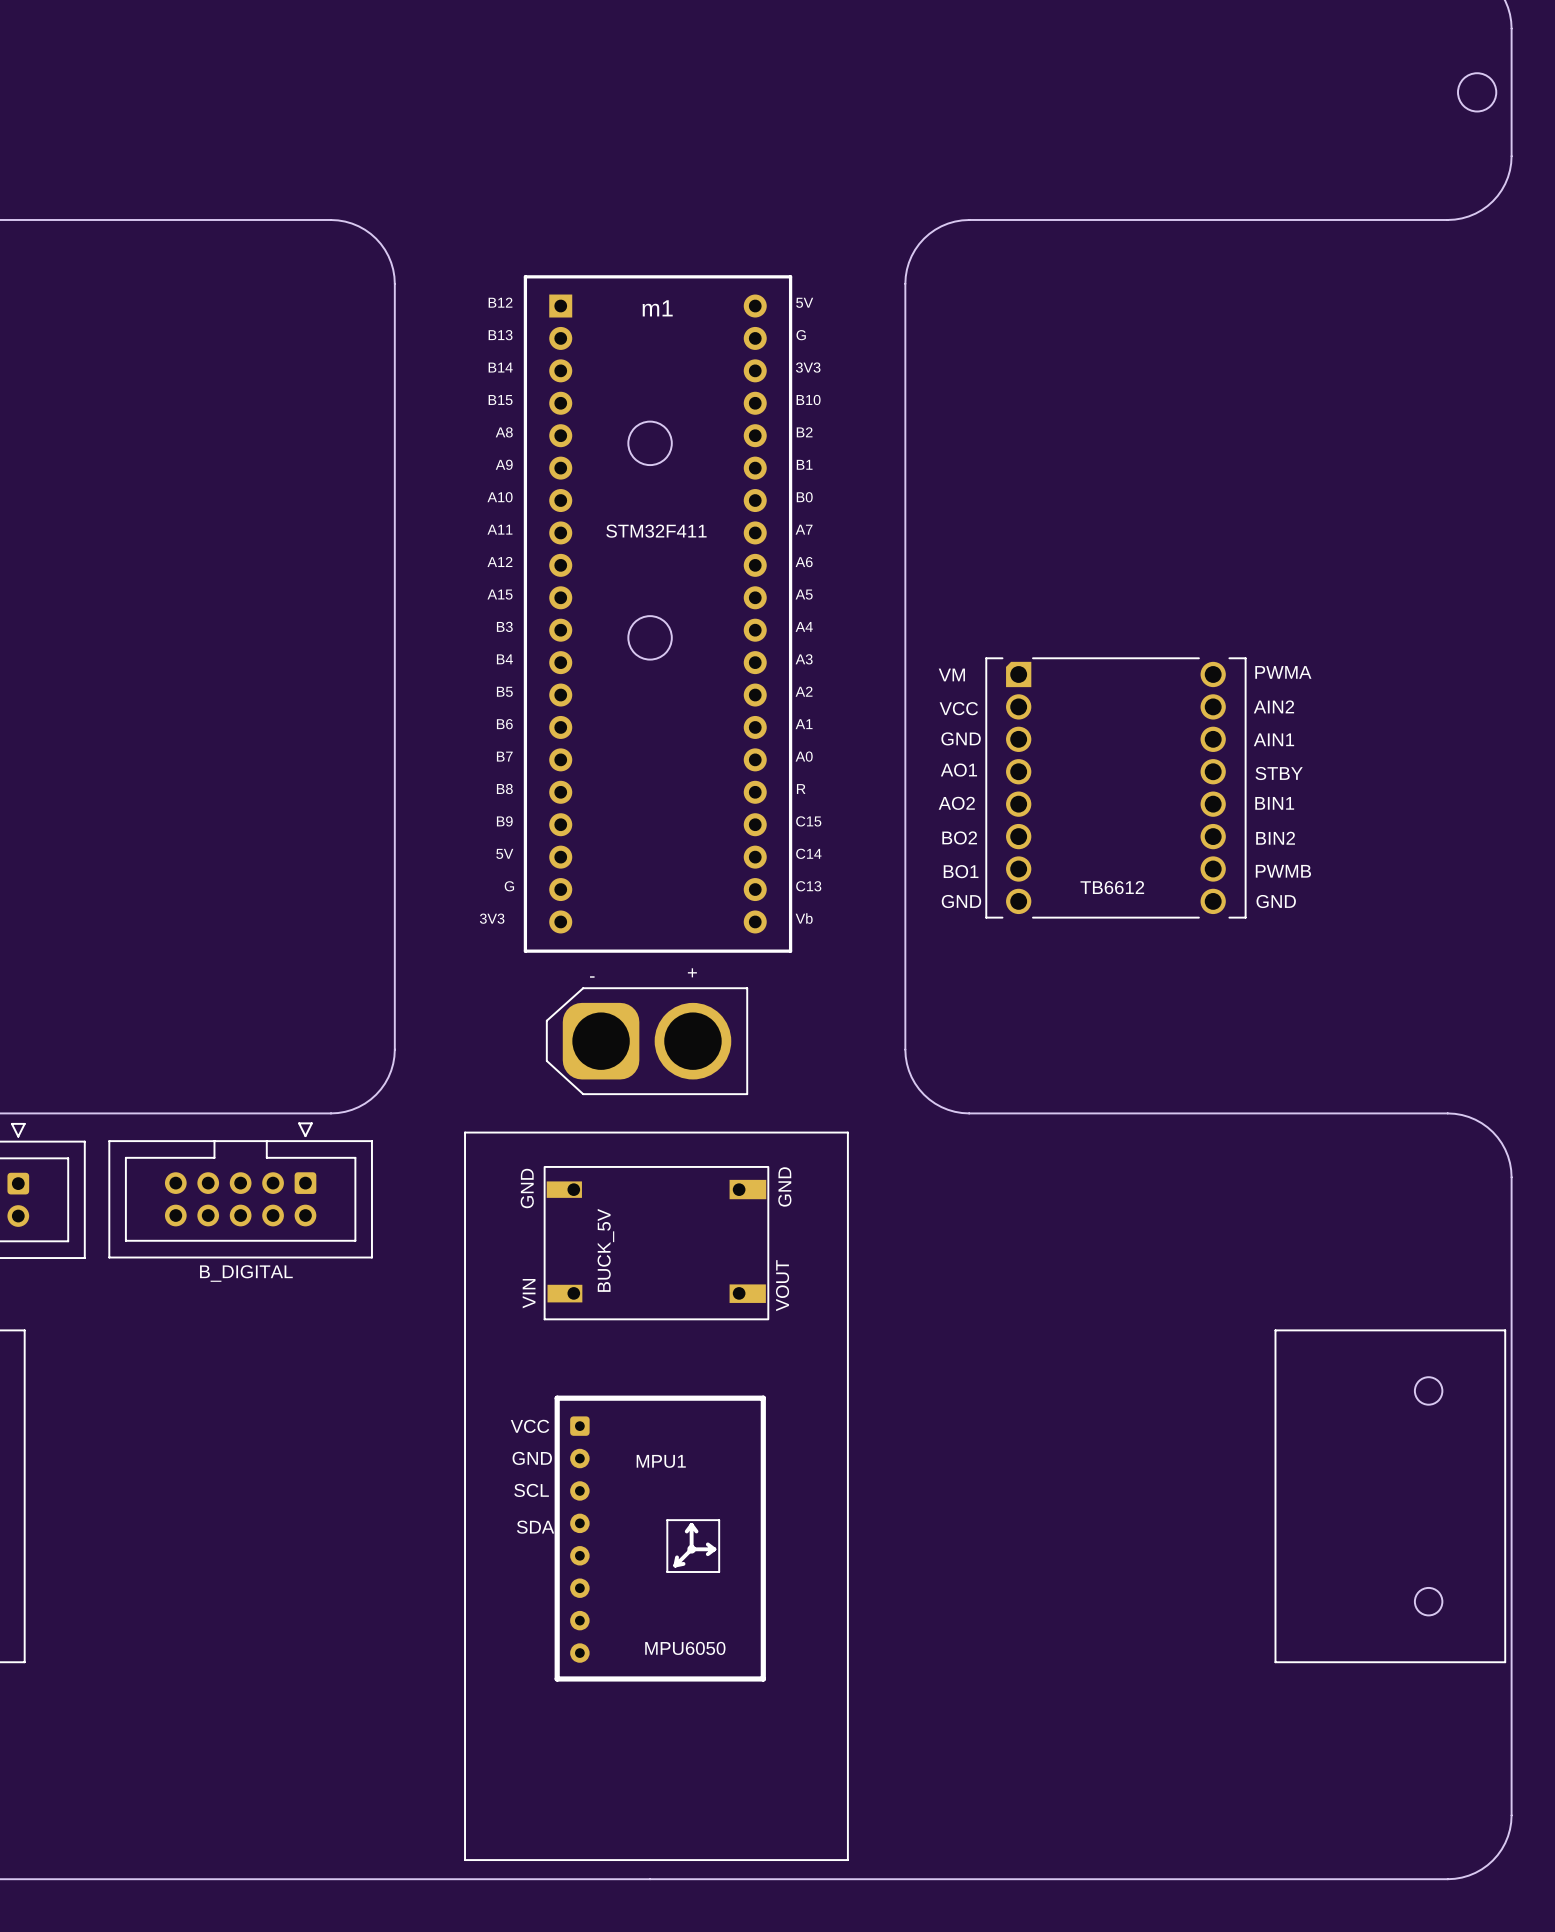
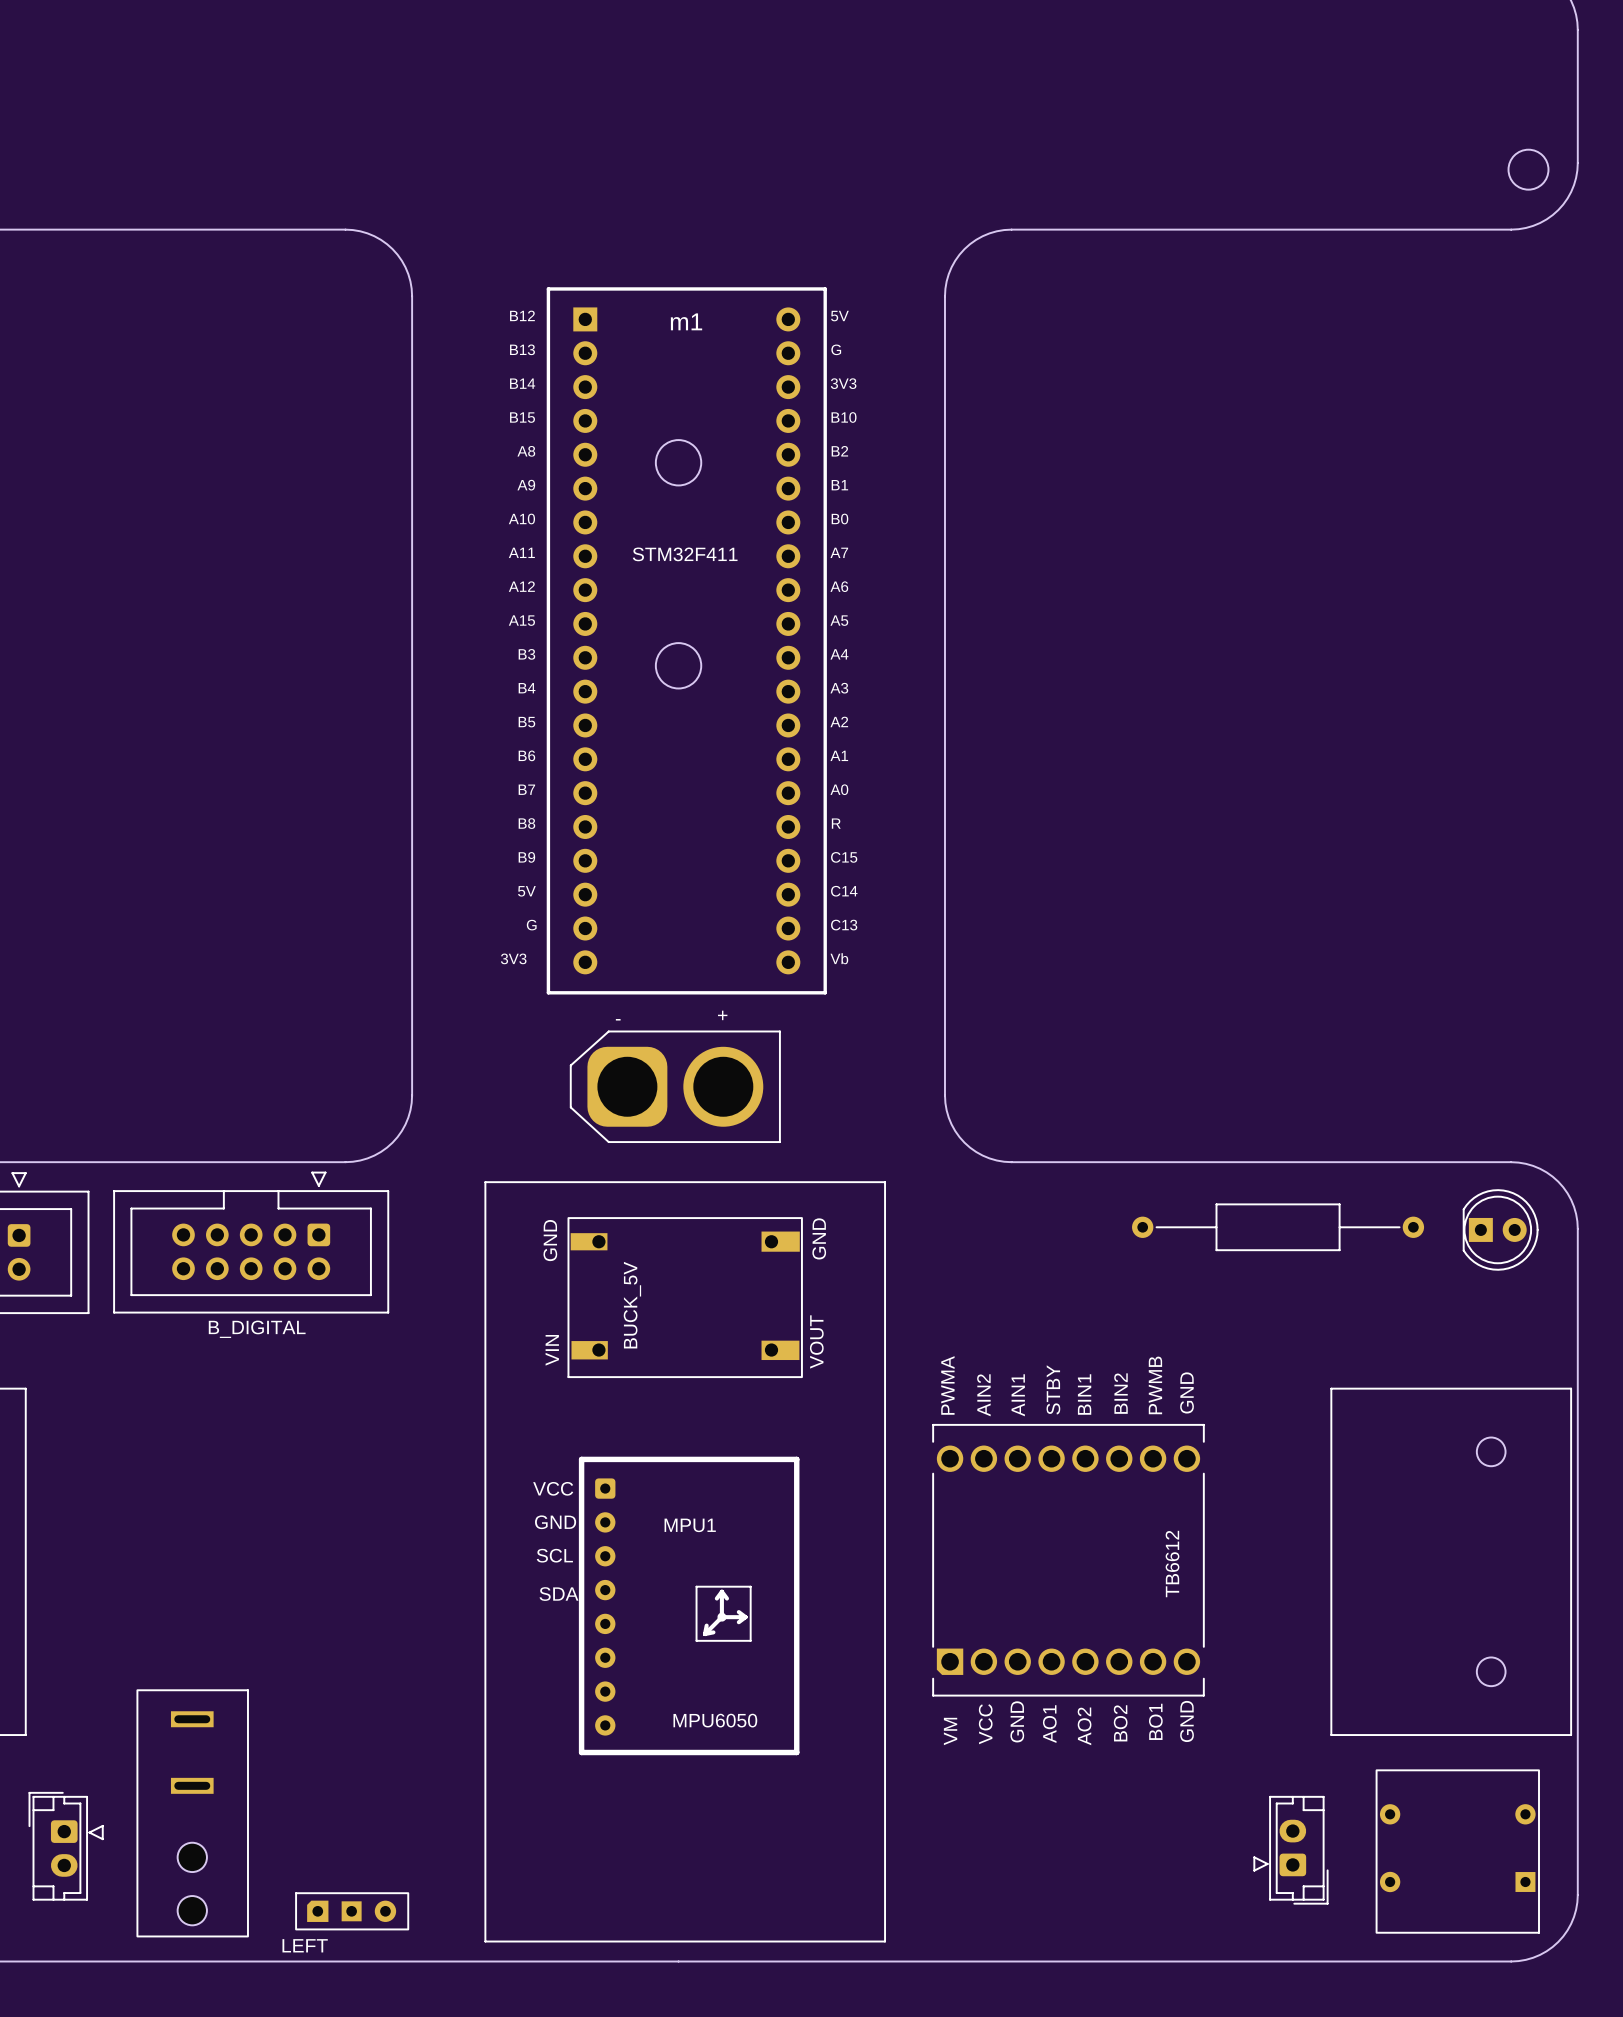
round board edge position: (1477, 92) -> (1528, 169)
part: (1115, 787) -> none
part: none -> (1278, 1227)
part: none -> (1500, 1229)
part: none -> (1068, 1560)
part: none -> (192, 1813)
part: none -> (66, 1846)
part: none -> (1290, 1850)
part: none -> (1457, 1851)
part: none -> (352, 1911)

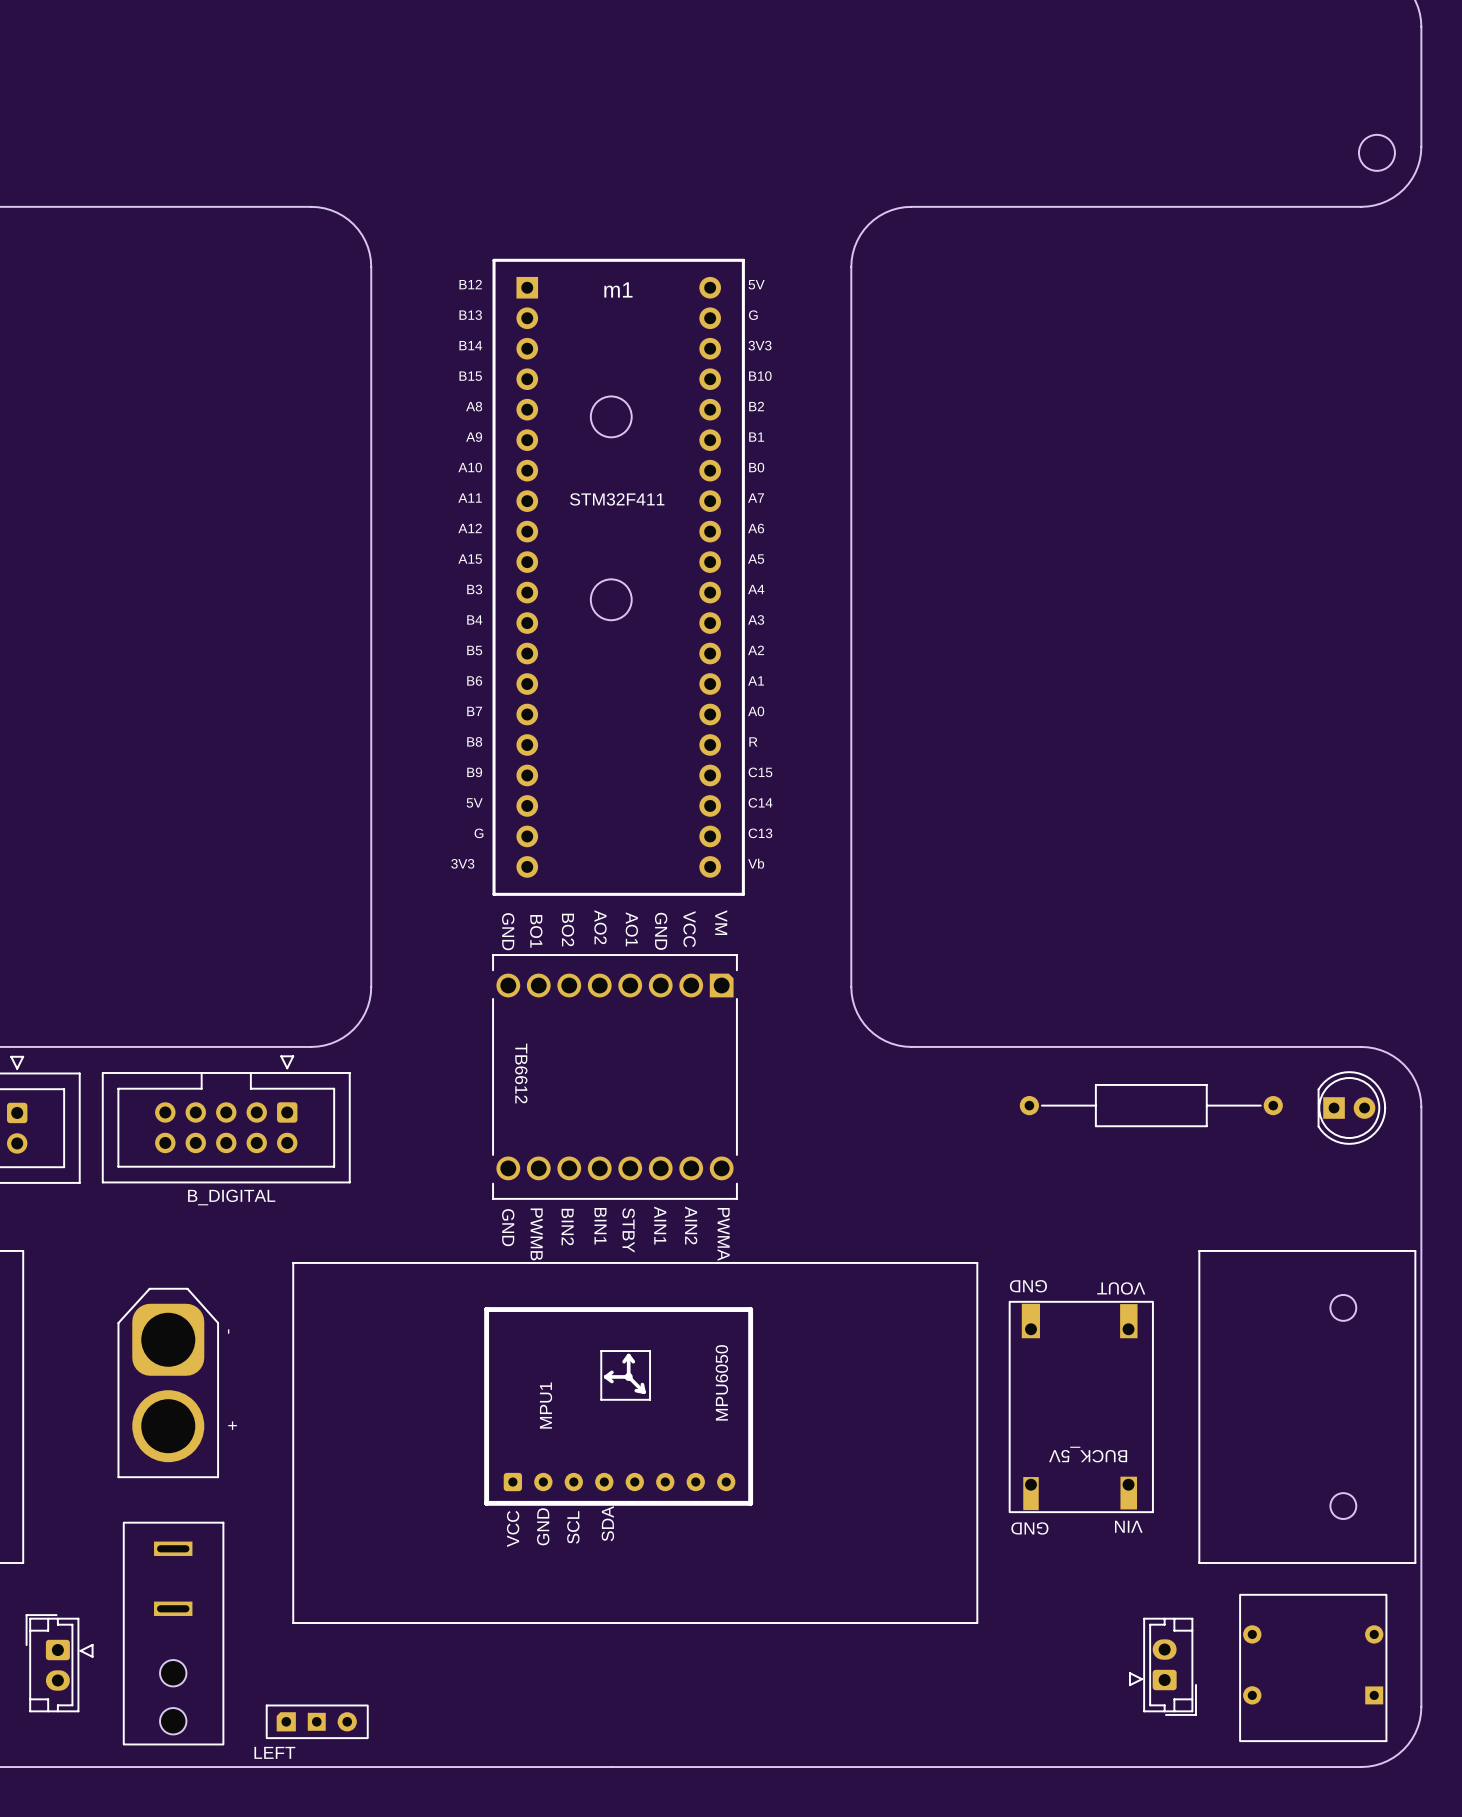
part: (675, 1086) -> none
line: (485, 1182) (885, 1182) (885, 1941) (485, 1941) (485, 1182) -> none
part: none -> (614, 1076)
part: (685, 1297) -> none
line: none -> (293, 1262) (977, 1262) (977, 1623) (293, 1623) (293, 1262)
part: none -> (168, 1382)
part: (1068, 1560) -> none
part: none -> (1081, 1406)
MPU1 rotation: 0° (689, 1605) -> 90° counterclockwise (618, 1406)

